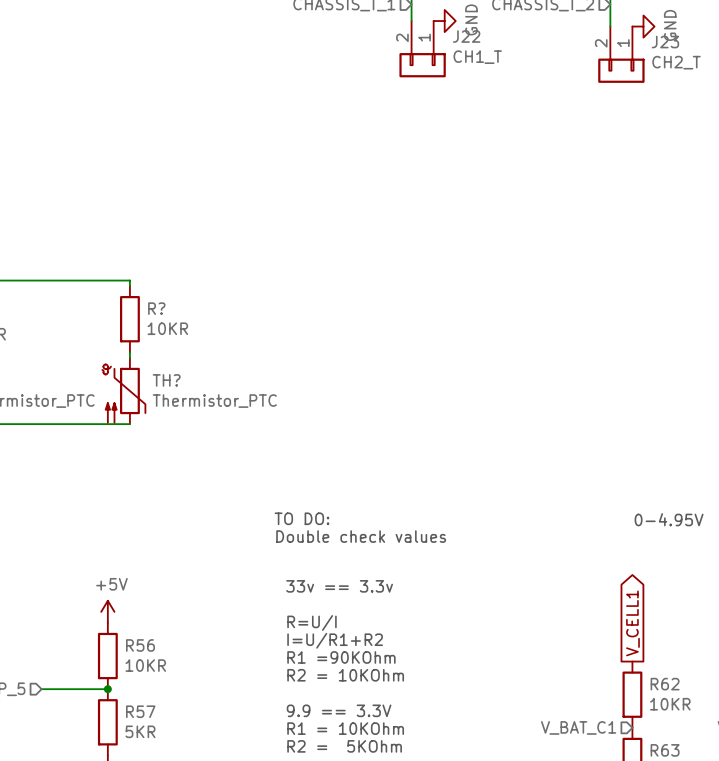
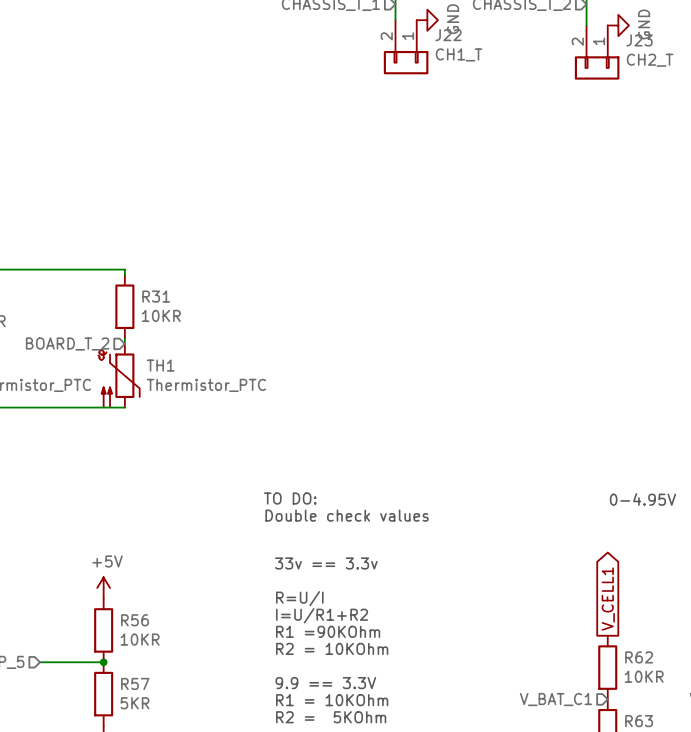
R? name: R? (156, 308) -> R31 (156, 296)
hierarchical label: none -> BOARD_T_2 (67, 344)
TH? name: TH? (166, 380) -> TH1 (160, 365)

